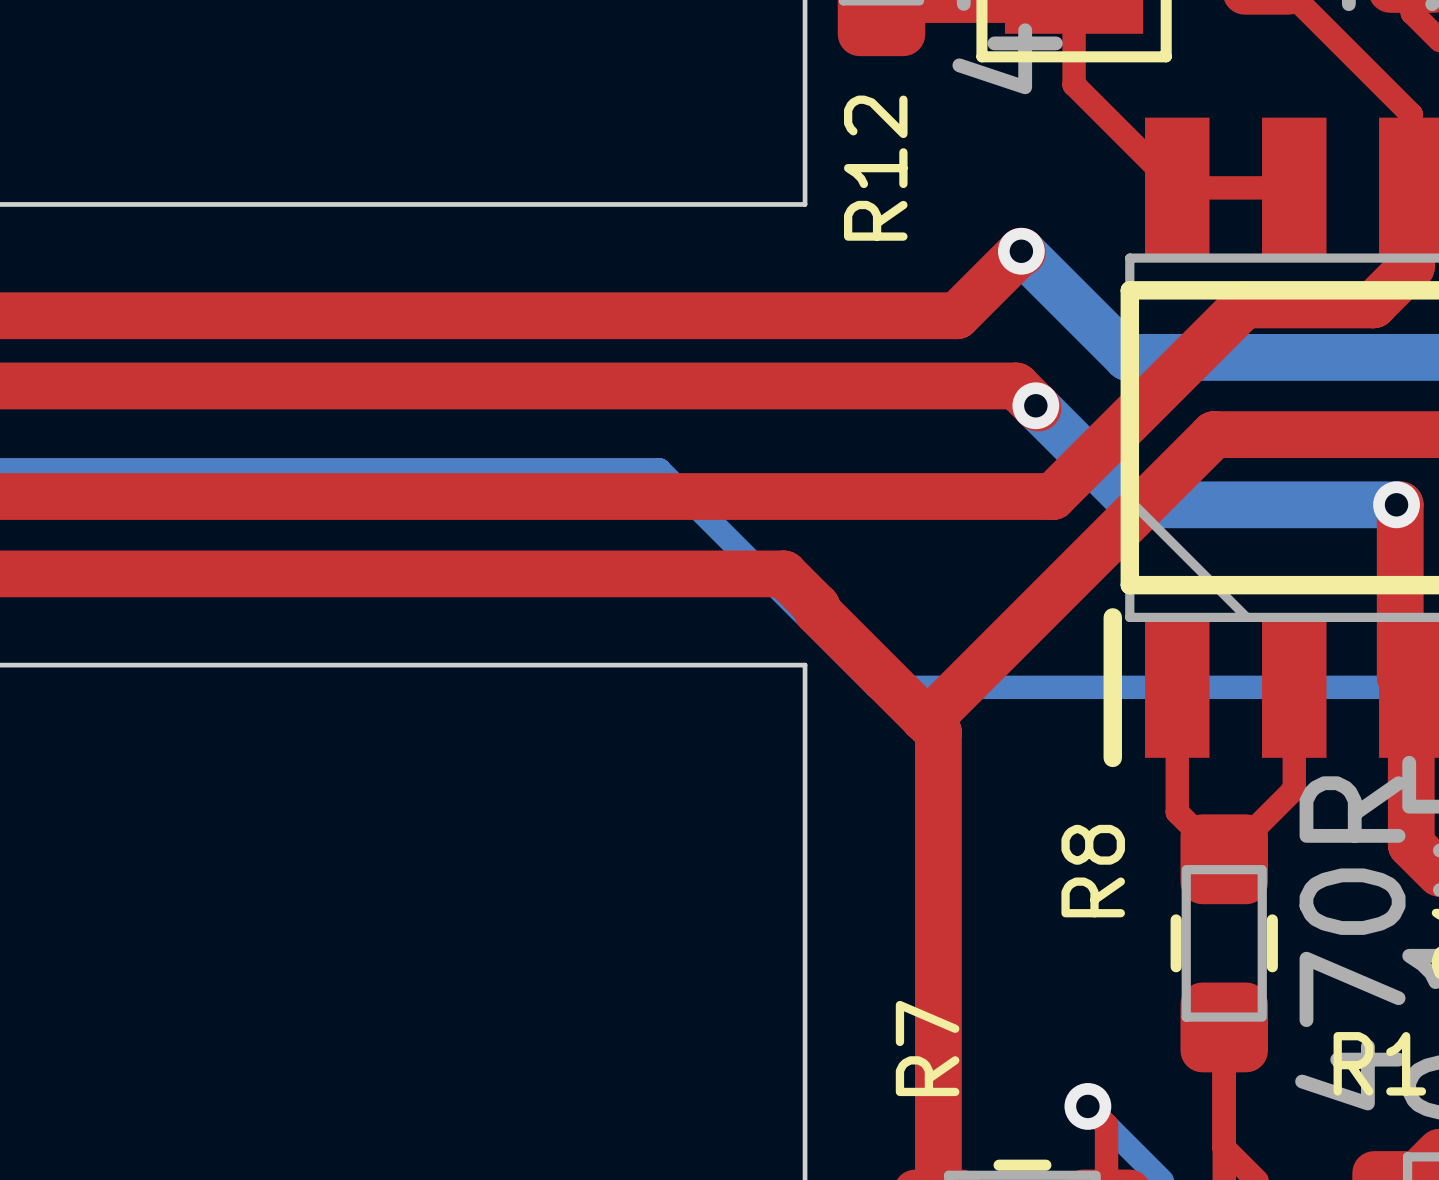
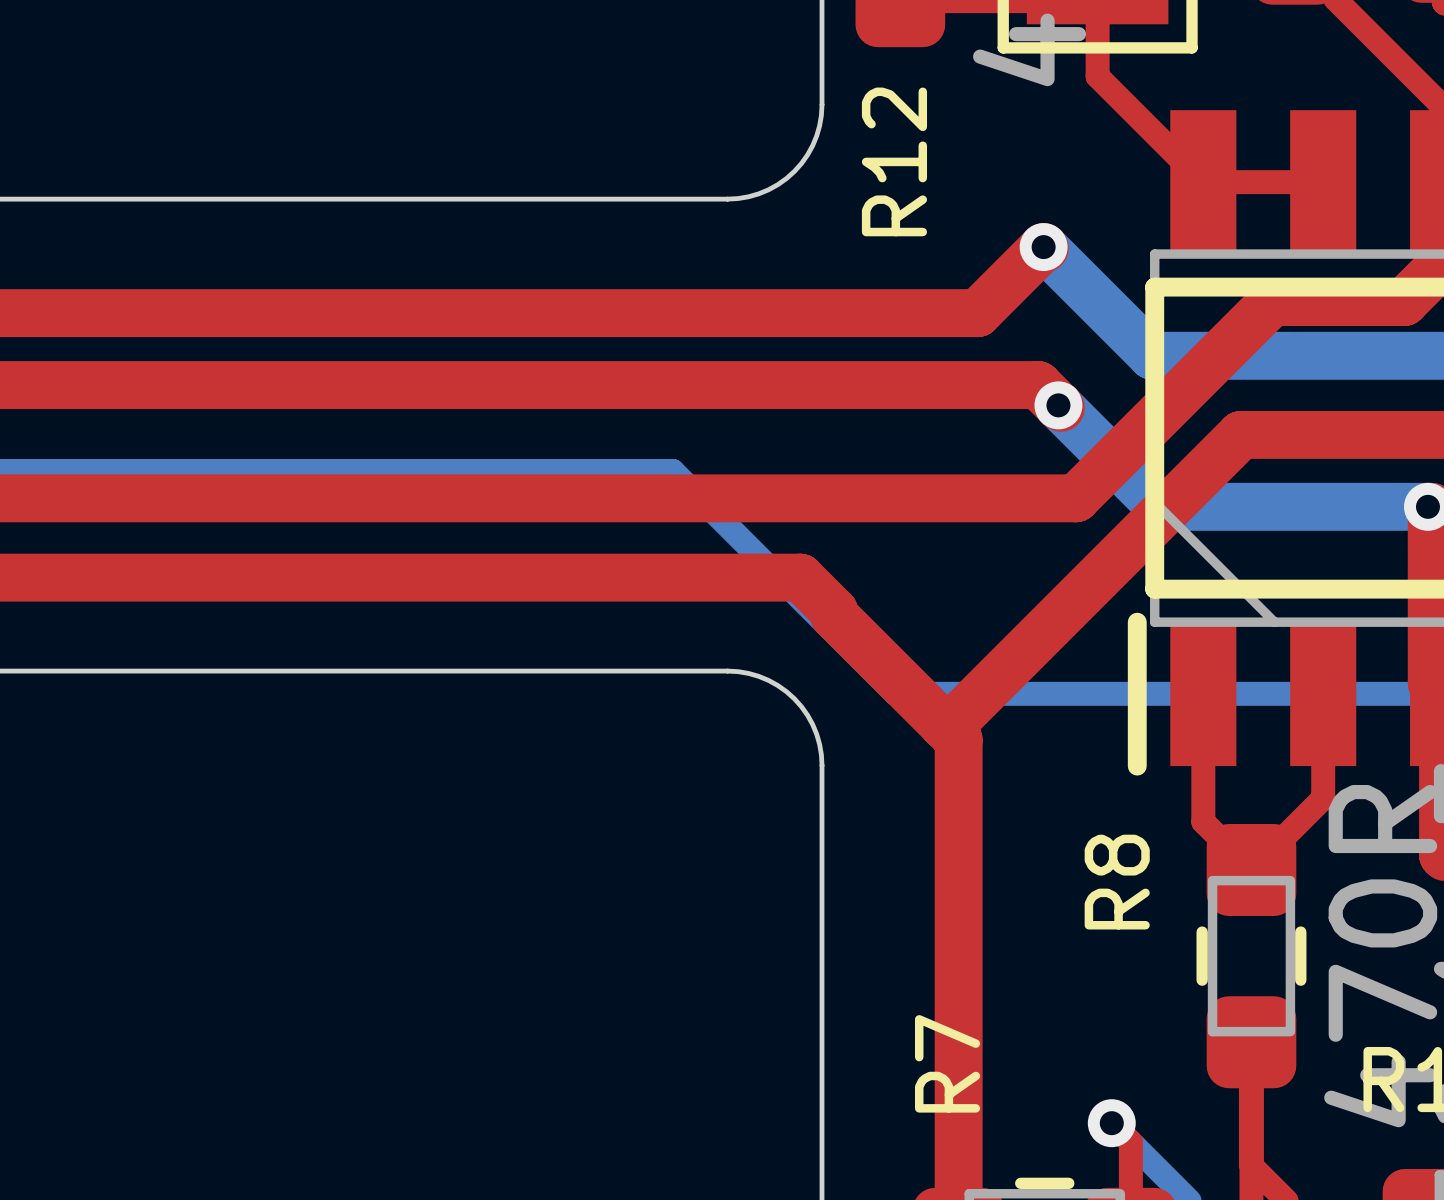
board edge: (805, 112) (805, 204) (712, 204) -> (822, 104) (816, 135) (807, 154) (794, 171) (768, 189) (748, 196) (727, 199)
board edge: (712, 665) (805, 665) (805, 757) -> (727, 671) (758, 676) (777, 685) (794, 698) (812, 724) (819, 744) (822, 765)

